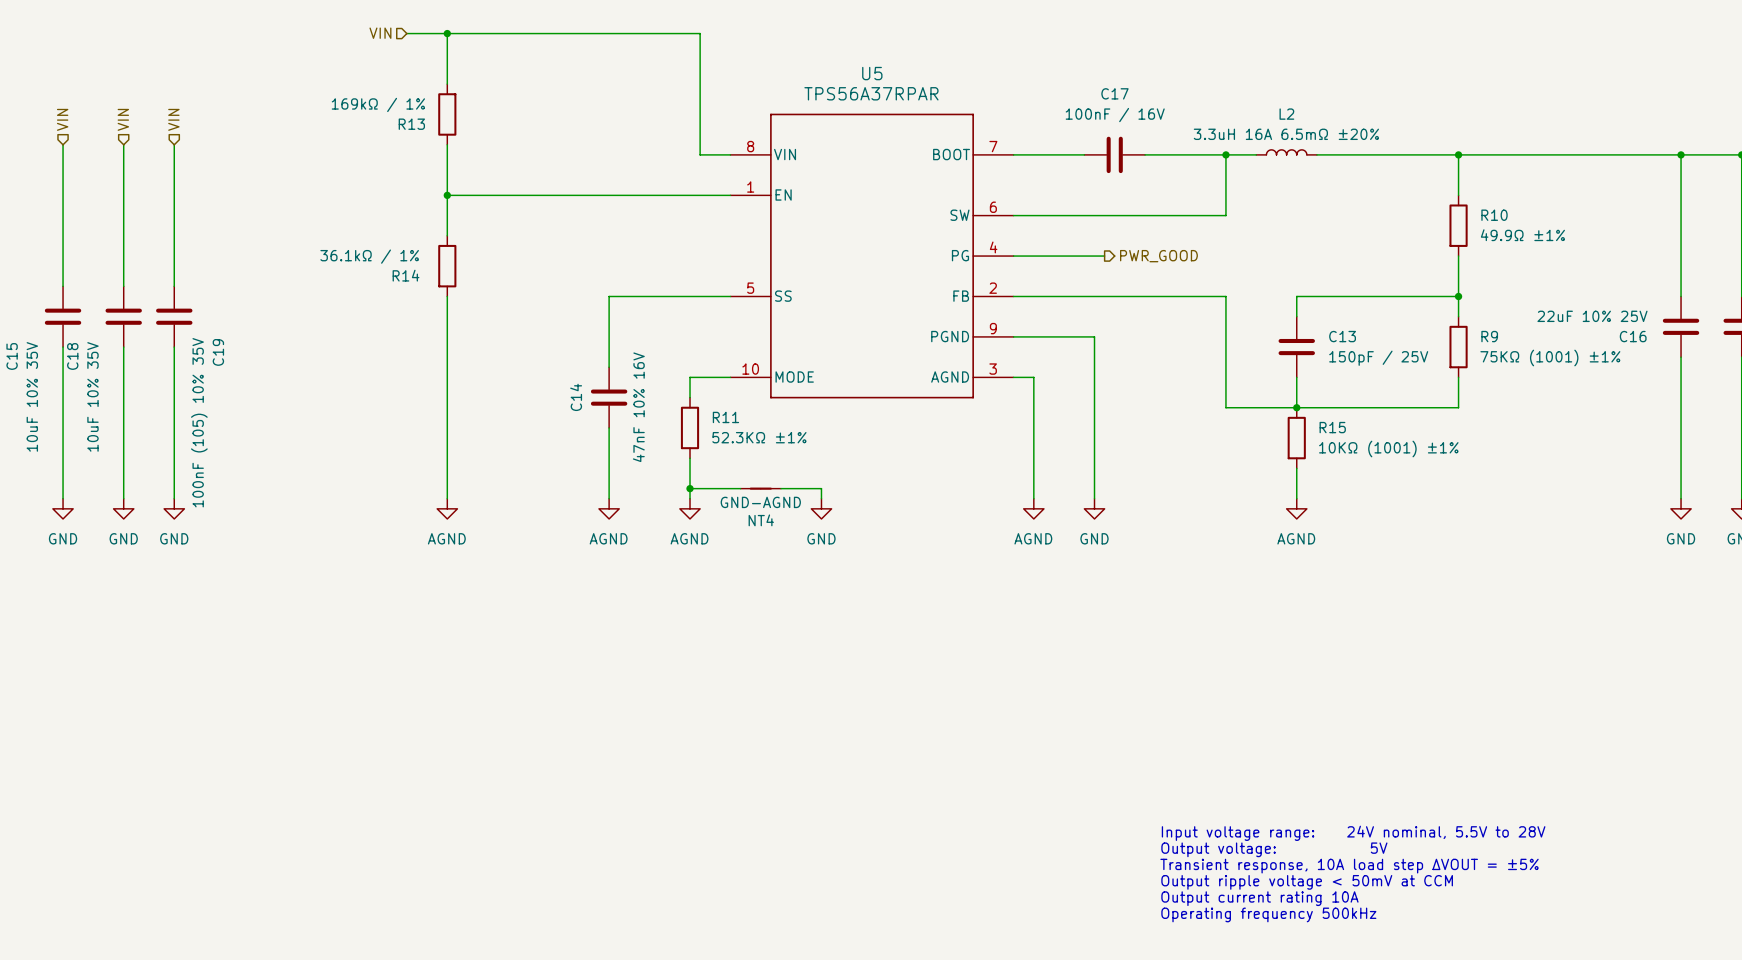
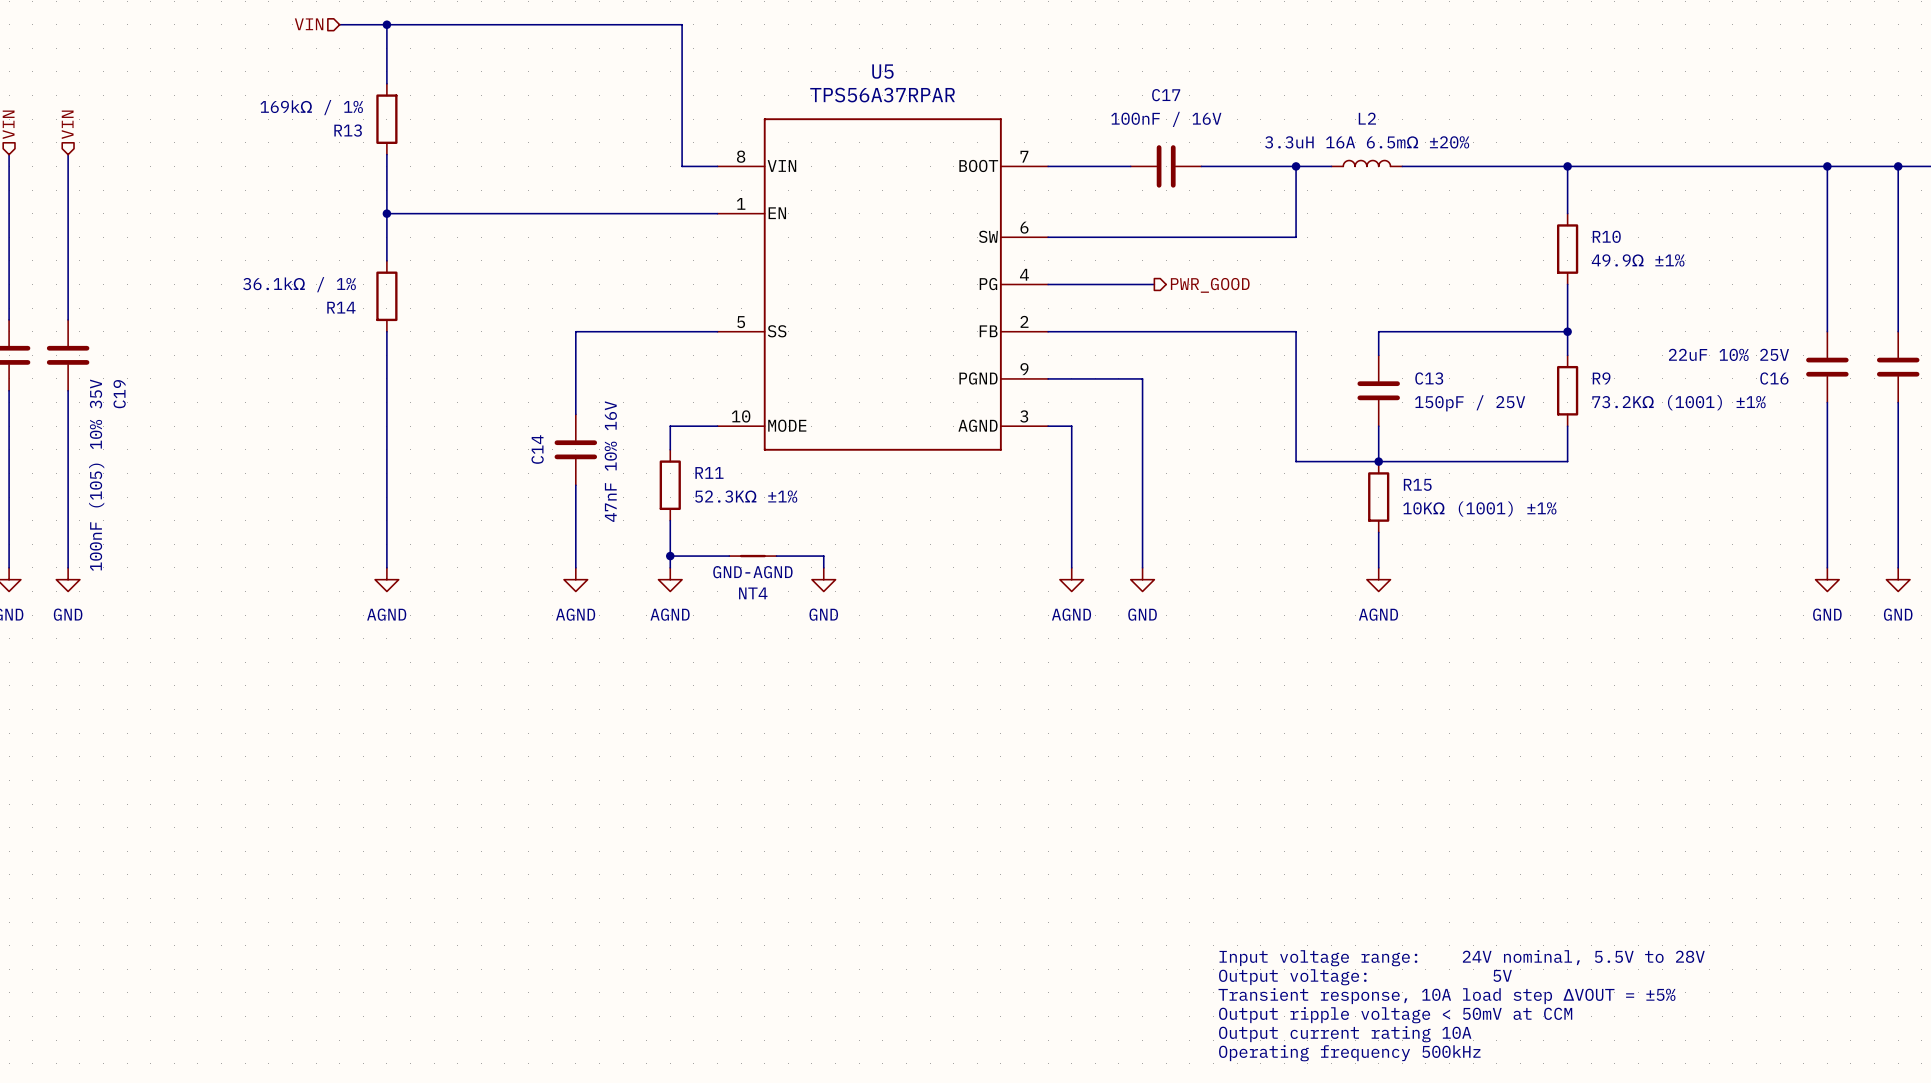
R9 value: 75KΩ (1001) ±1% (1550, 357) -> 73.2KΩ (1001) ±1% (1679, 402)

